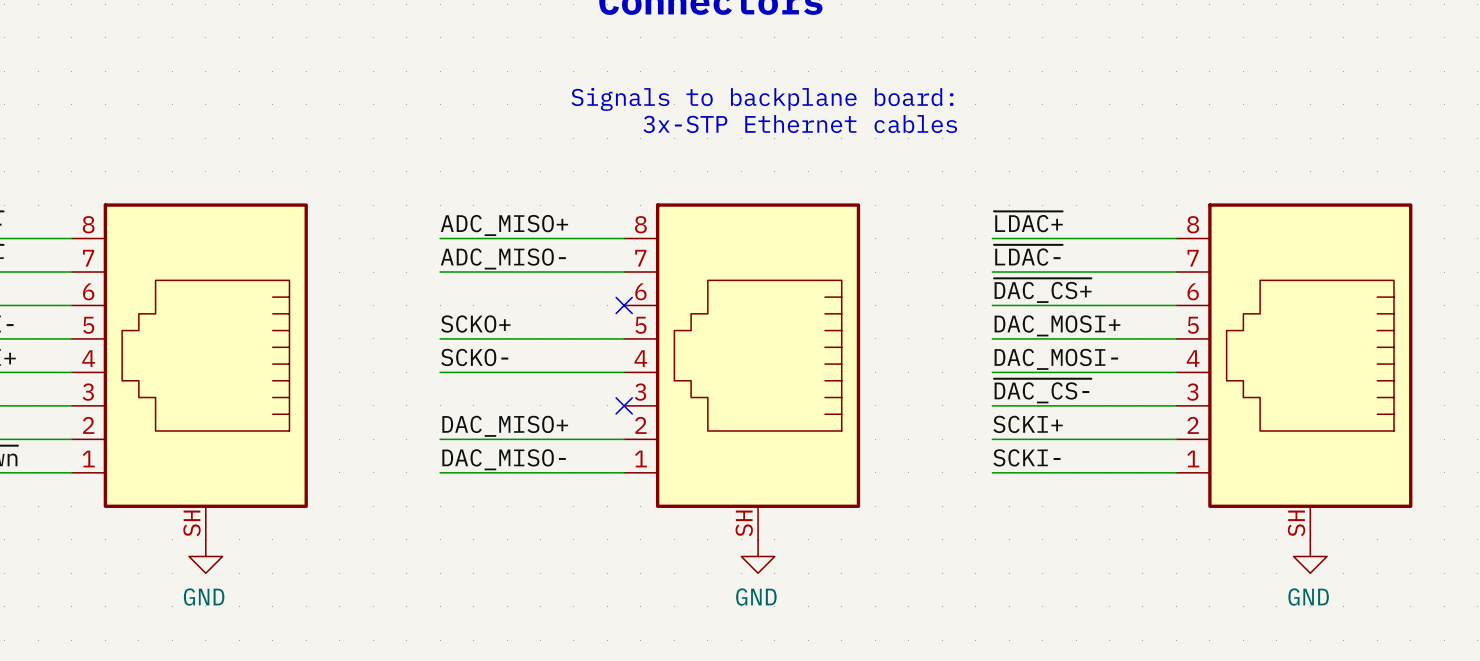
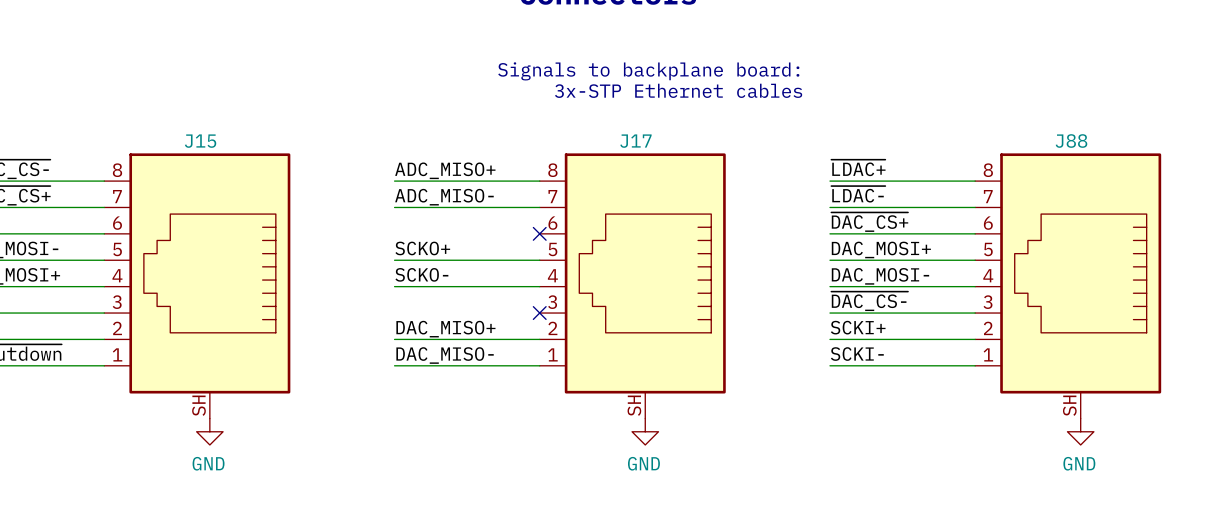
J15 name: none -> J15 (200, 141)
J17 name: none -> J17 (635, 141)
J88 name: none -> J88 (1071, 141)

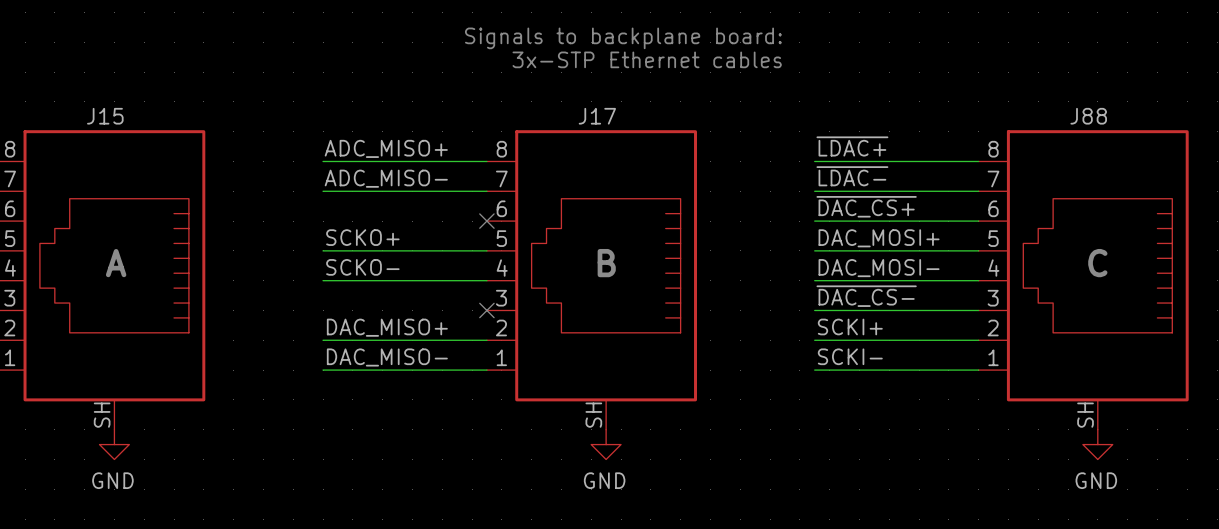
text: none -> A (116, 263)
text: none -> B (606, 263)
text: none -> C (1097, 263)

